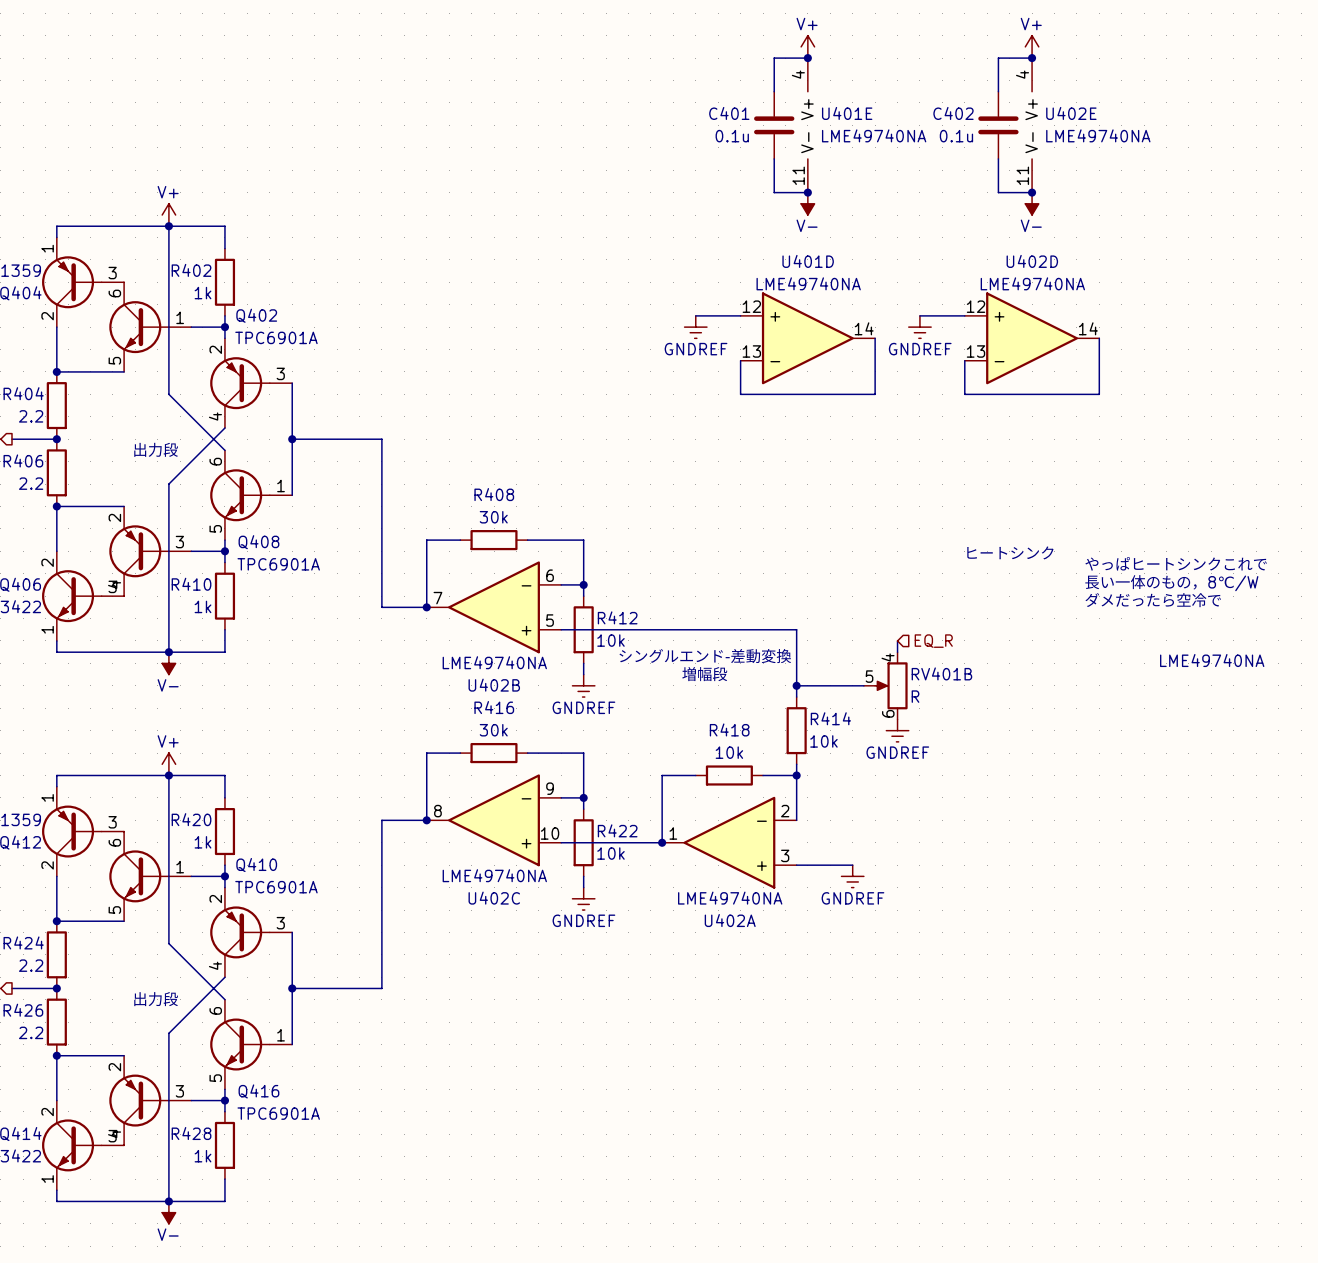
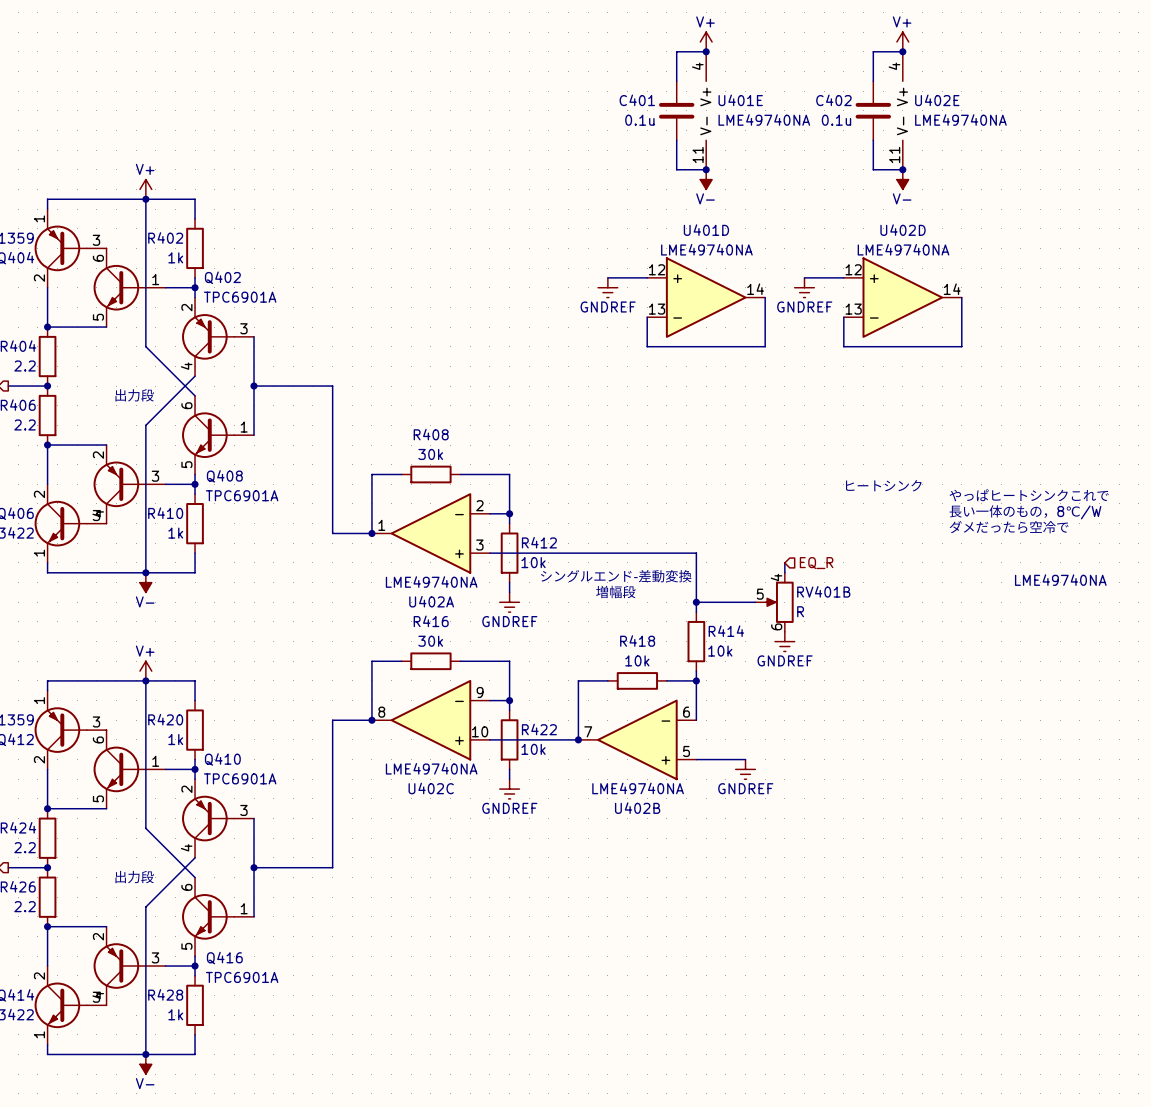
U402B position: (494, 607) -> (637, 739)
U402A position: (729, 842) -> (430, 533)

